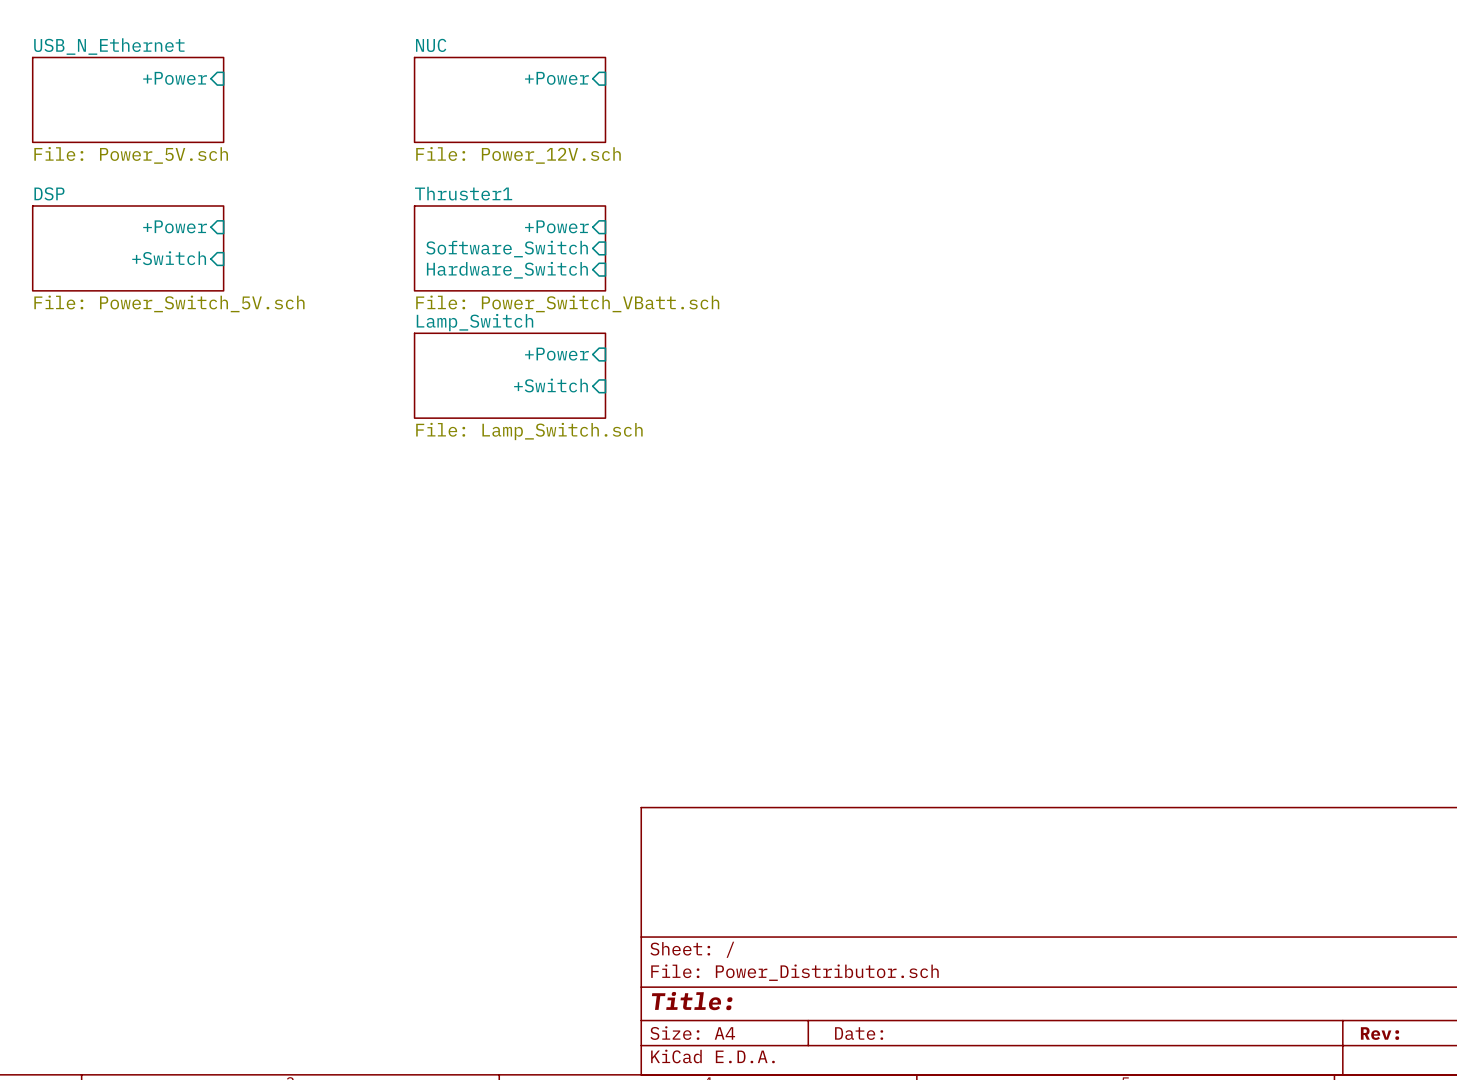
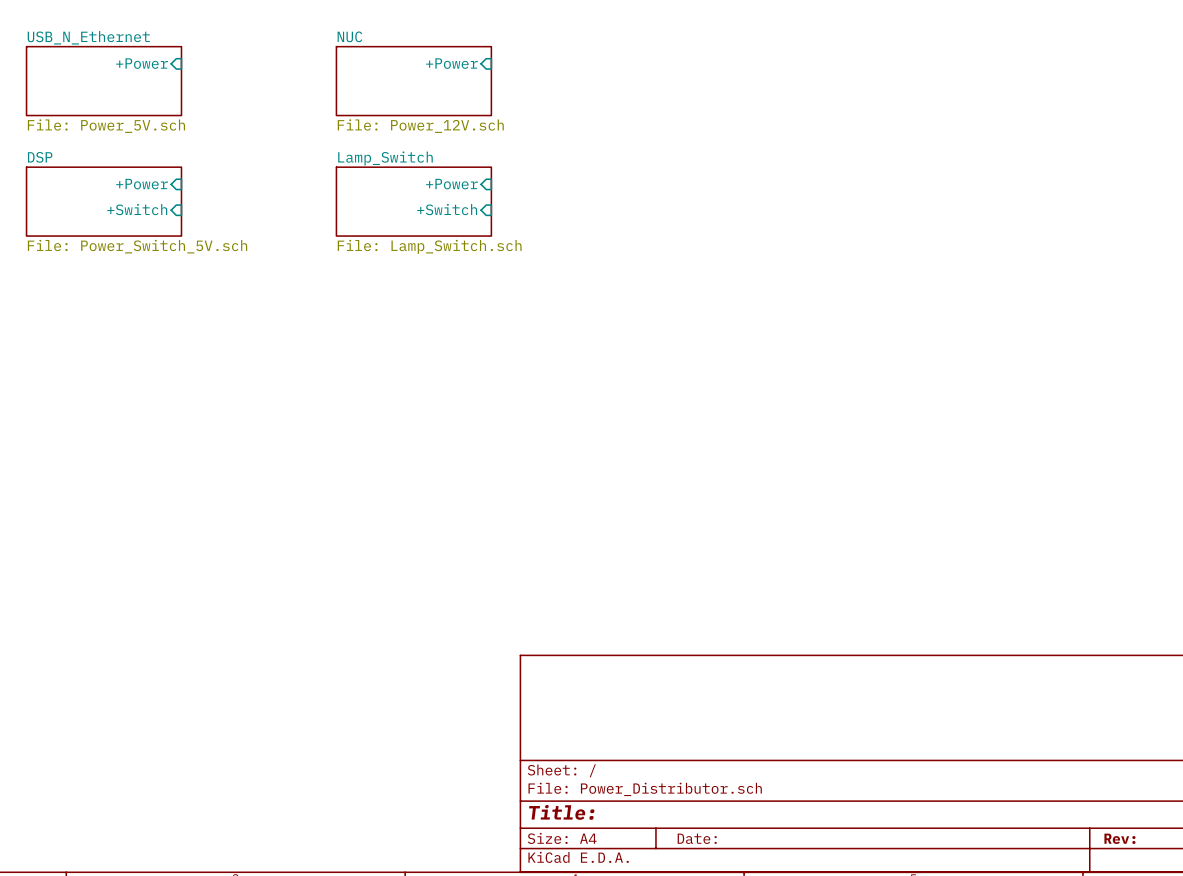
sheet Thruster1 name: Thruster1 (463, 193) -> Lamp_Switch (385, 158)
sheet pin: Software_Switch (507, 249) -> none
sheet pin: Hardware_Switch (507, 270) -> none
sheet Thruster1 value: File: Power_Switch_VBatt.sch (567, 303) -> File: Lamp_Switch.sch (429, 246)
sheet pin: +Power (556, 354) -> none
sheet Lamp_Switch: File: Lamp_Switch.sch (510, 375) -> none
sheet pin position: +Switch (551, 385) -> +Switch (447, 209)

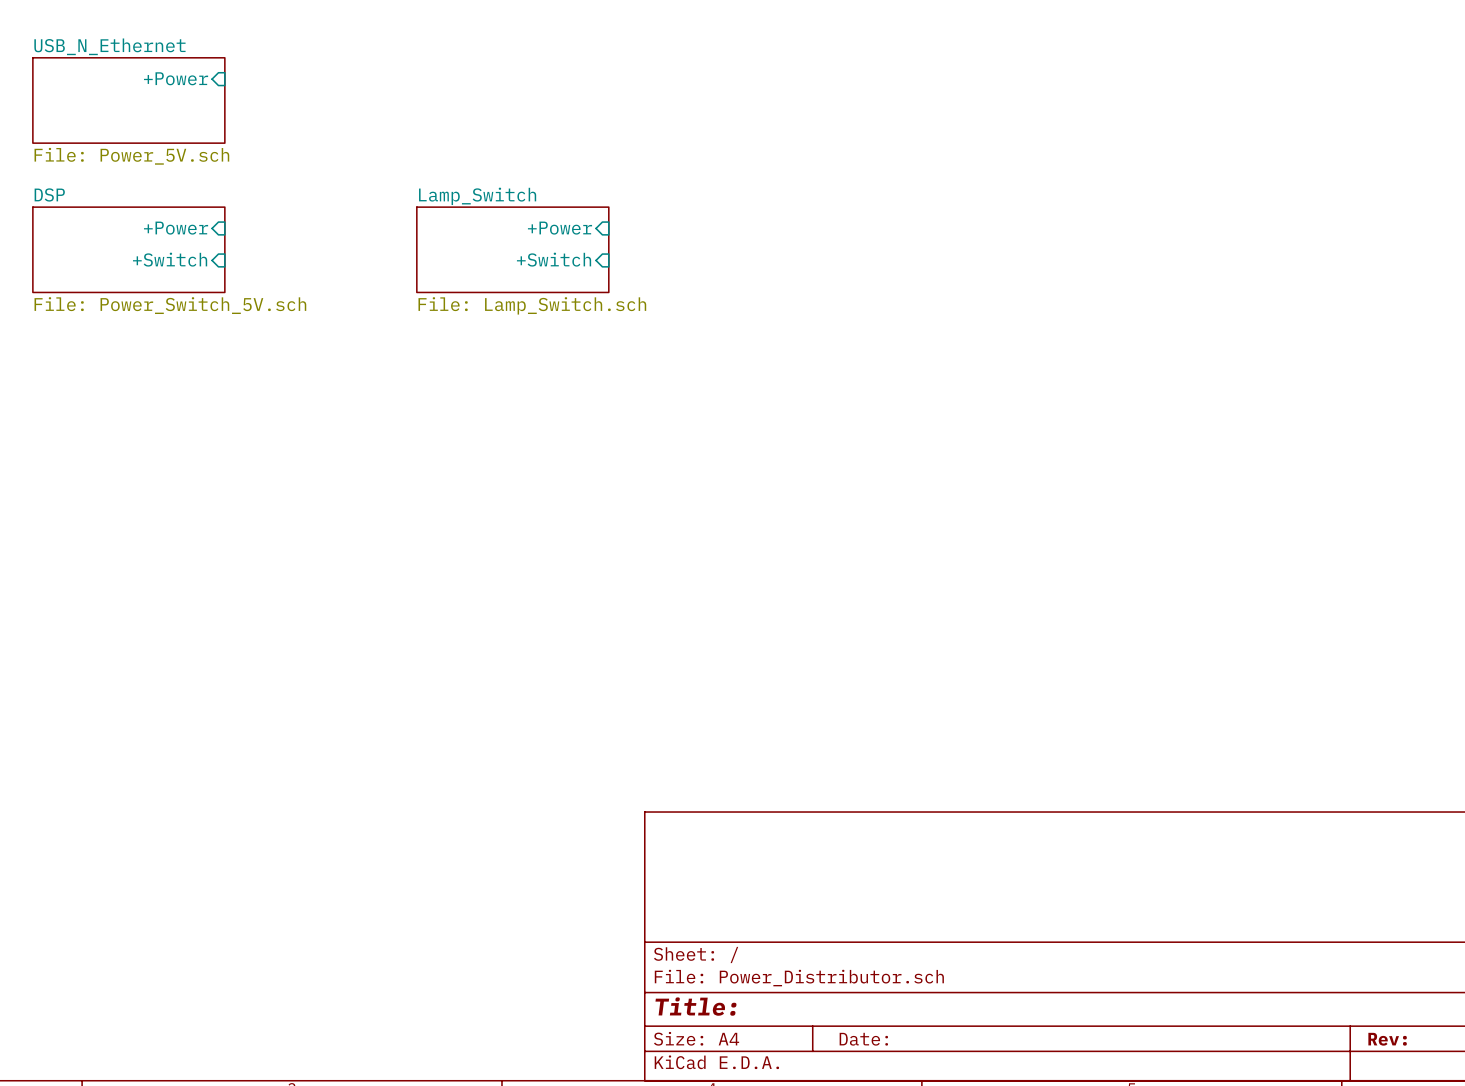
sheet pin: +Power (451, 63) -> none
sheet NUC: File: Power_12V.sch (413, 81) -> none

